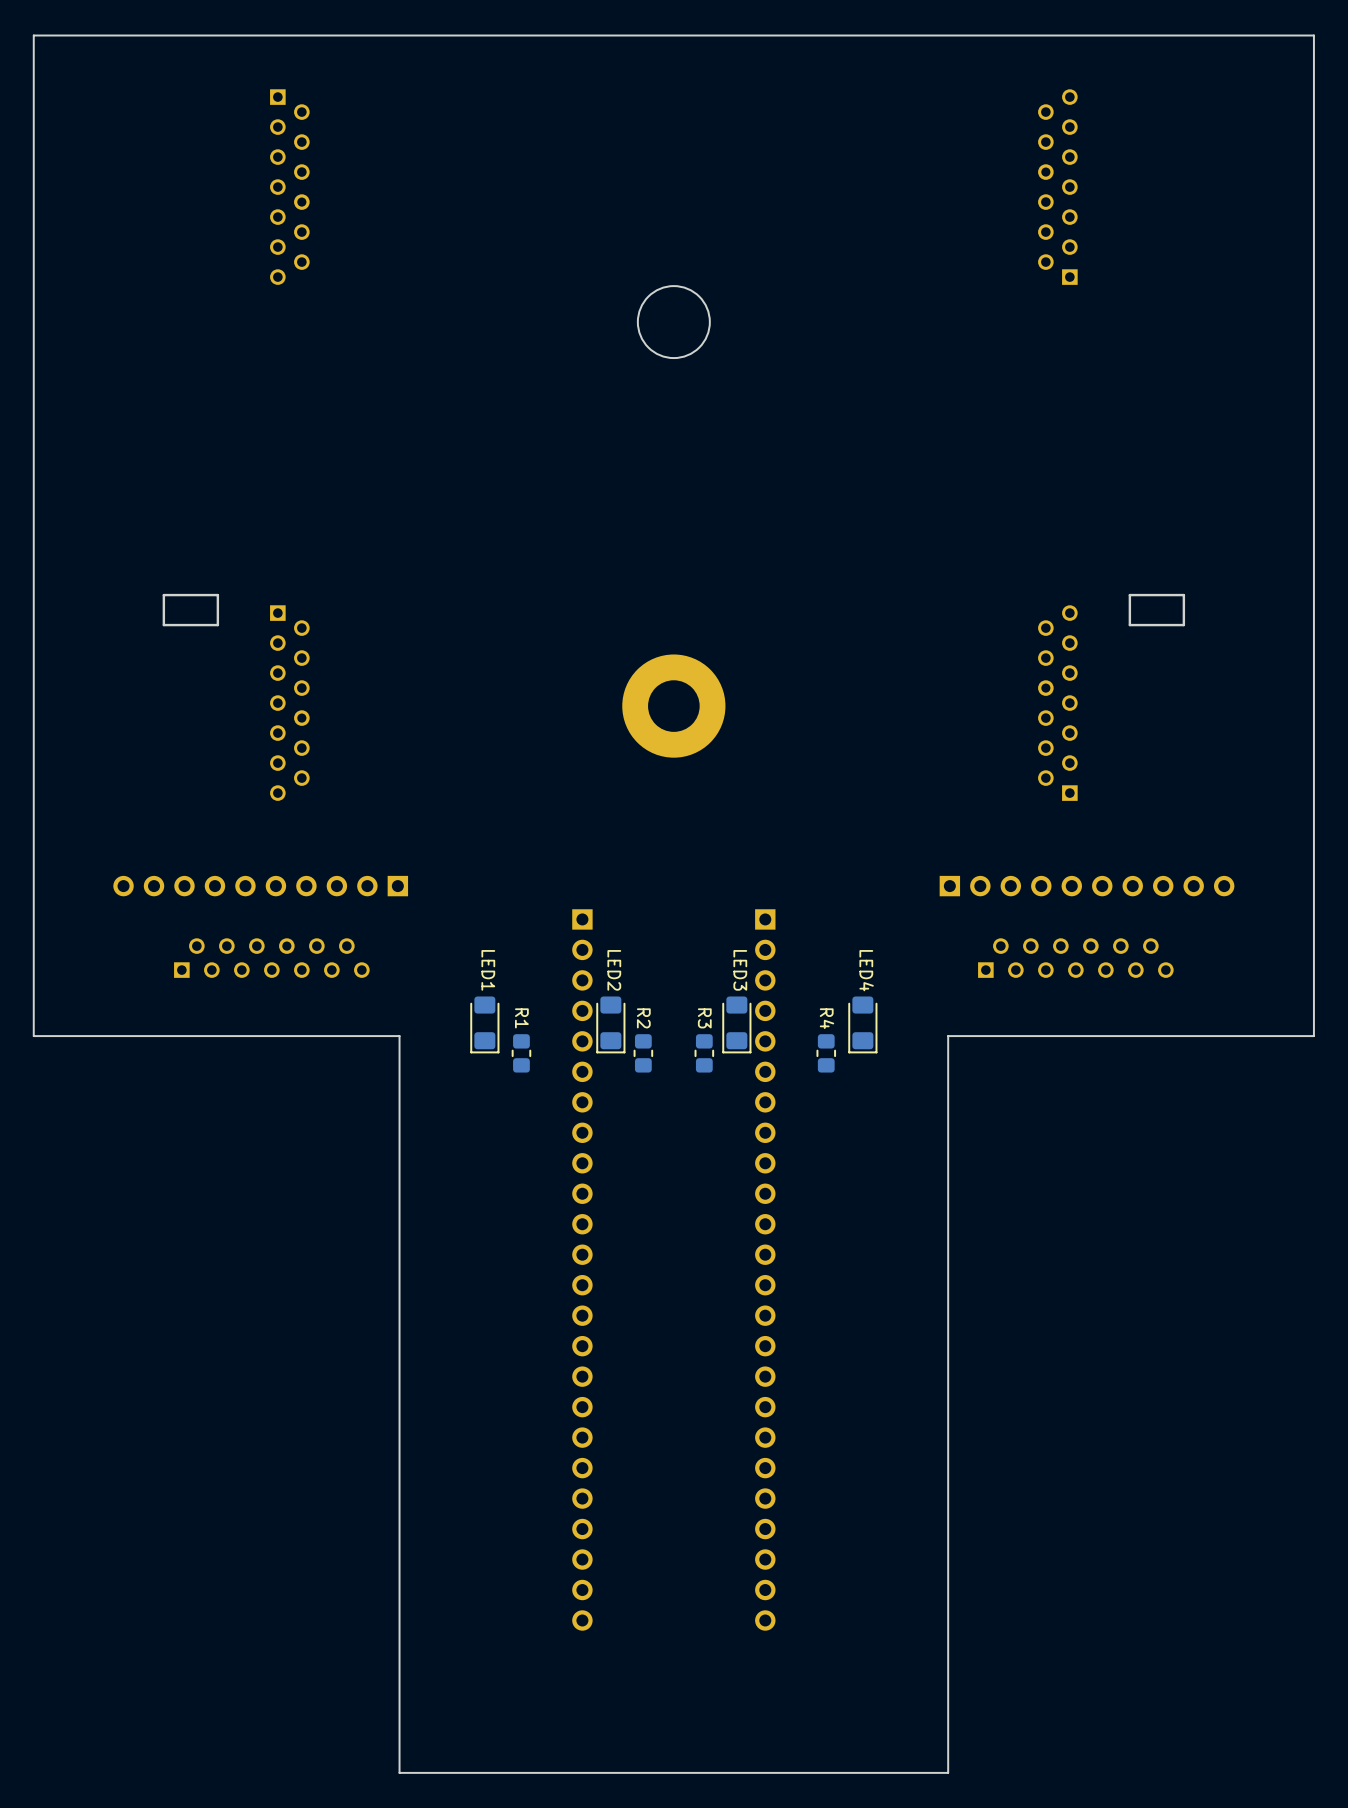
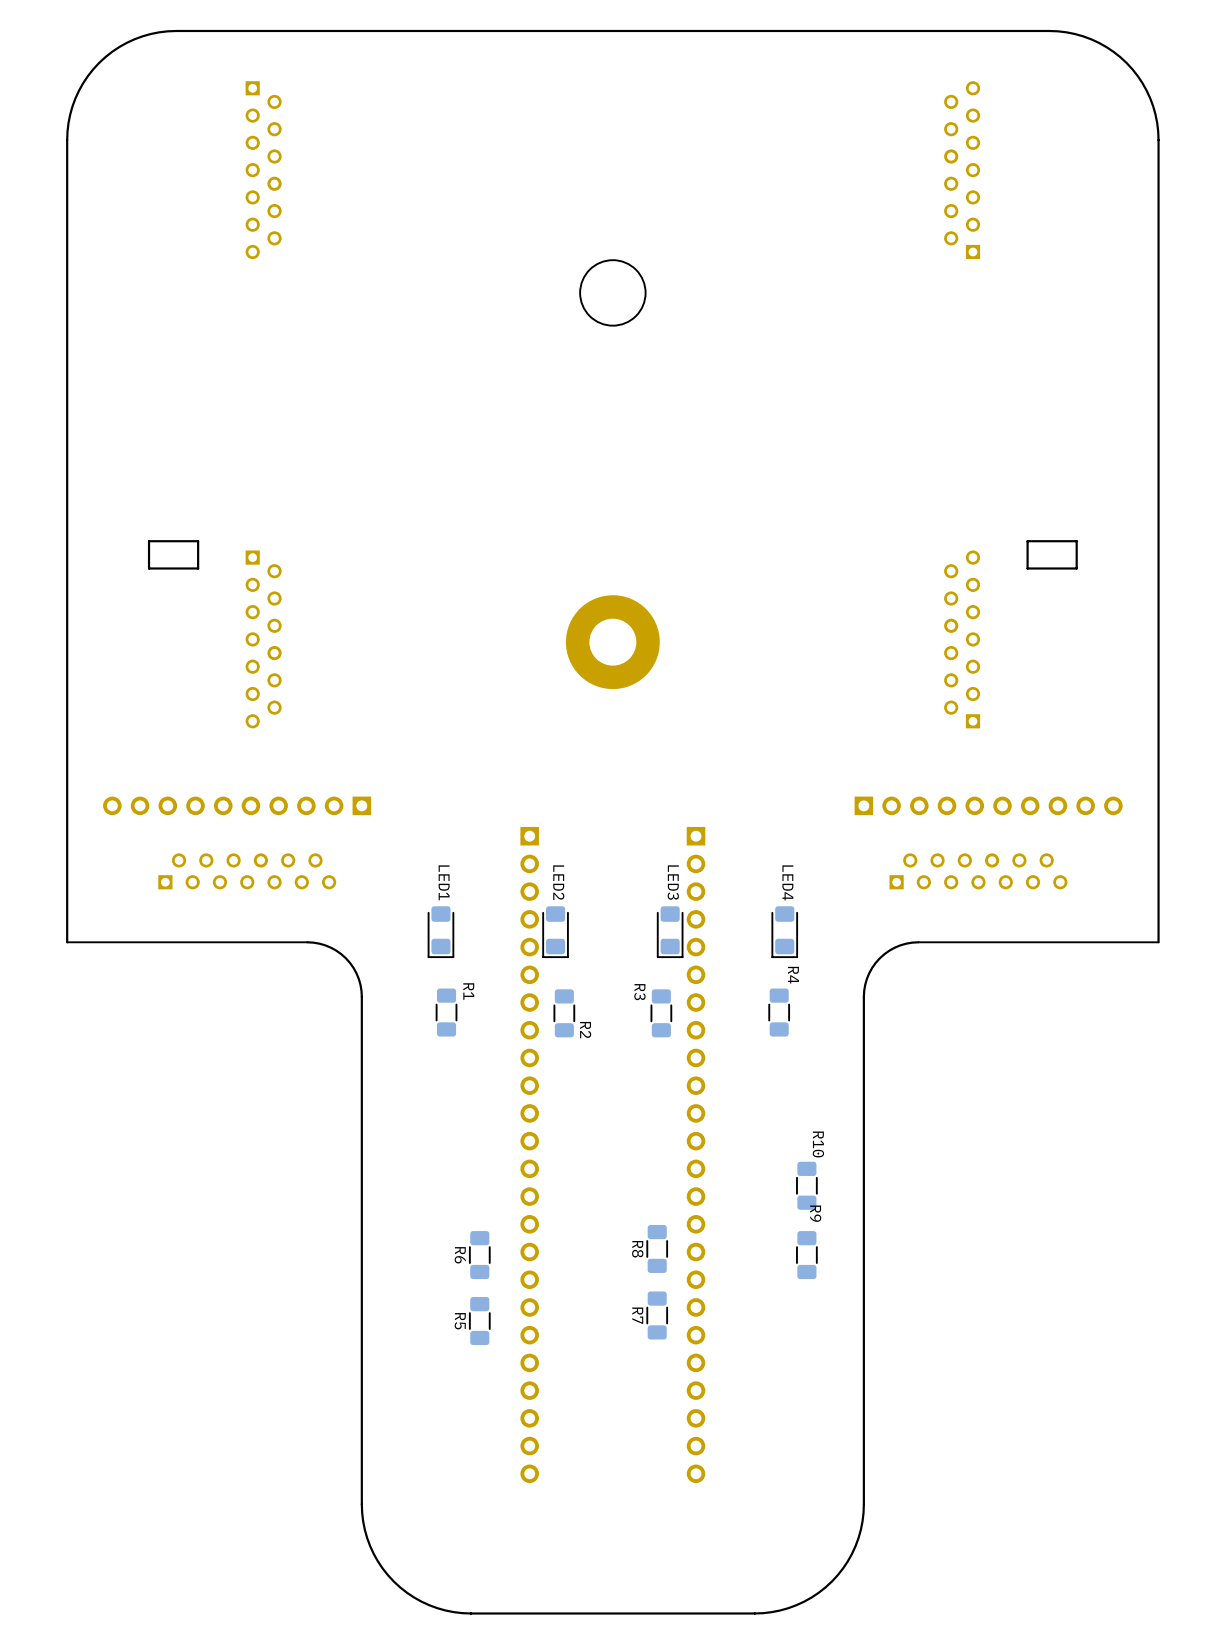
R1 name position: R1 (521, 1018) -> R1 (468, 991)
R2 name position: R2 (643, 1018) -> R2 (585, 1030)
R3 name position: R3 (704, 1018) -> R3 (639, 992)
R1 footprint: [511, 1034, 531, 1073] -> [435, 988, 458, 1037]
R2 footprint: [633, 1034, 653, 1073] -> [553, 989, 575, 1038]
R3 footprint: [694, 1034, 714, 1073] -> [650, 989, 672, 1038]
R4 footprint: [816, 1034, 836, 1073] -> [768, 988, 790, 1037]
board edge: (1009, 1036) (948, 1036) (948, 1772) (399, 1772) (399, 1036) (337, 1036) -> (918, 942) (900, 945) (884, 954) (872, 967) (864, 990) (863, 1504) (860, 1529) (851, 1553) (843, 1568) (818, 1592) (788, 1608) (754, 1613) (453, 1612) (429, 1605) (406, 1592) (387, 1575) (377, 1561) (367, 1538) (361, 1504) (361, 990) (353, 967) (341, 954) (325, 945) (307, 942)
board edge: (1273, 1036) (1313, 1036) (1313, 35) (33, 35) (33, 1036) (73, 1036) -> (1158, 942) (1157, 123) (1146, 90) (1137, 75) (1120, 57) (1098, 42) (1083, 36) (1049, 30) (176, 30) (150, 34) (134, 39) (112, 51) (99, 62) (88, 75) (75, 98) (70, 114) (67, 140) (67, 942)
R10: none -> (806, 1185)
R8: none -> (657, 1248)
R6: none -> (479, 1255)
R9: none -> (806, 1255)
R7: none -> (657, 1315)
R5: none -> (479, 1321)

